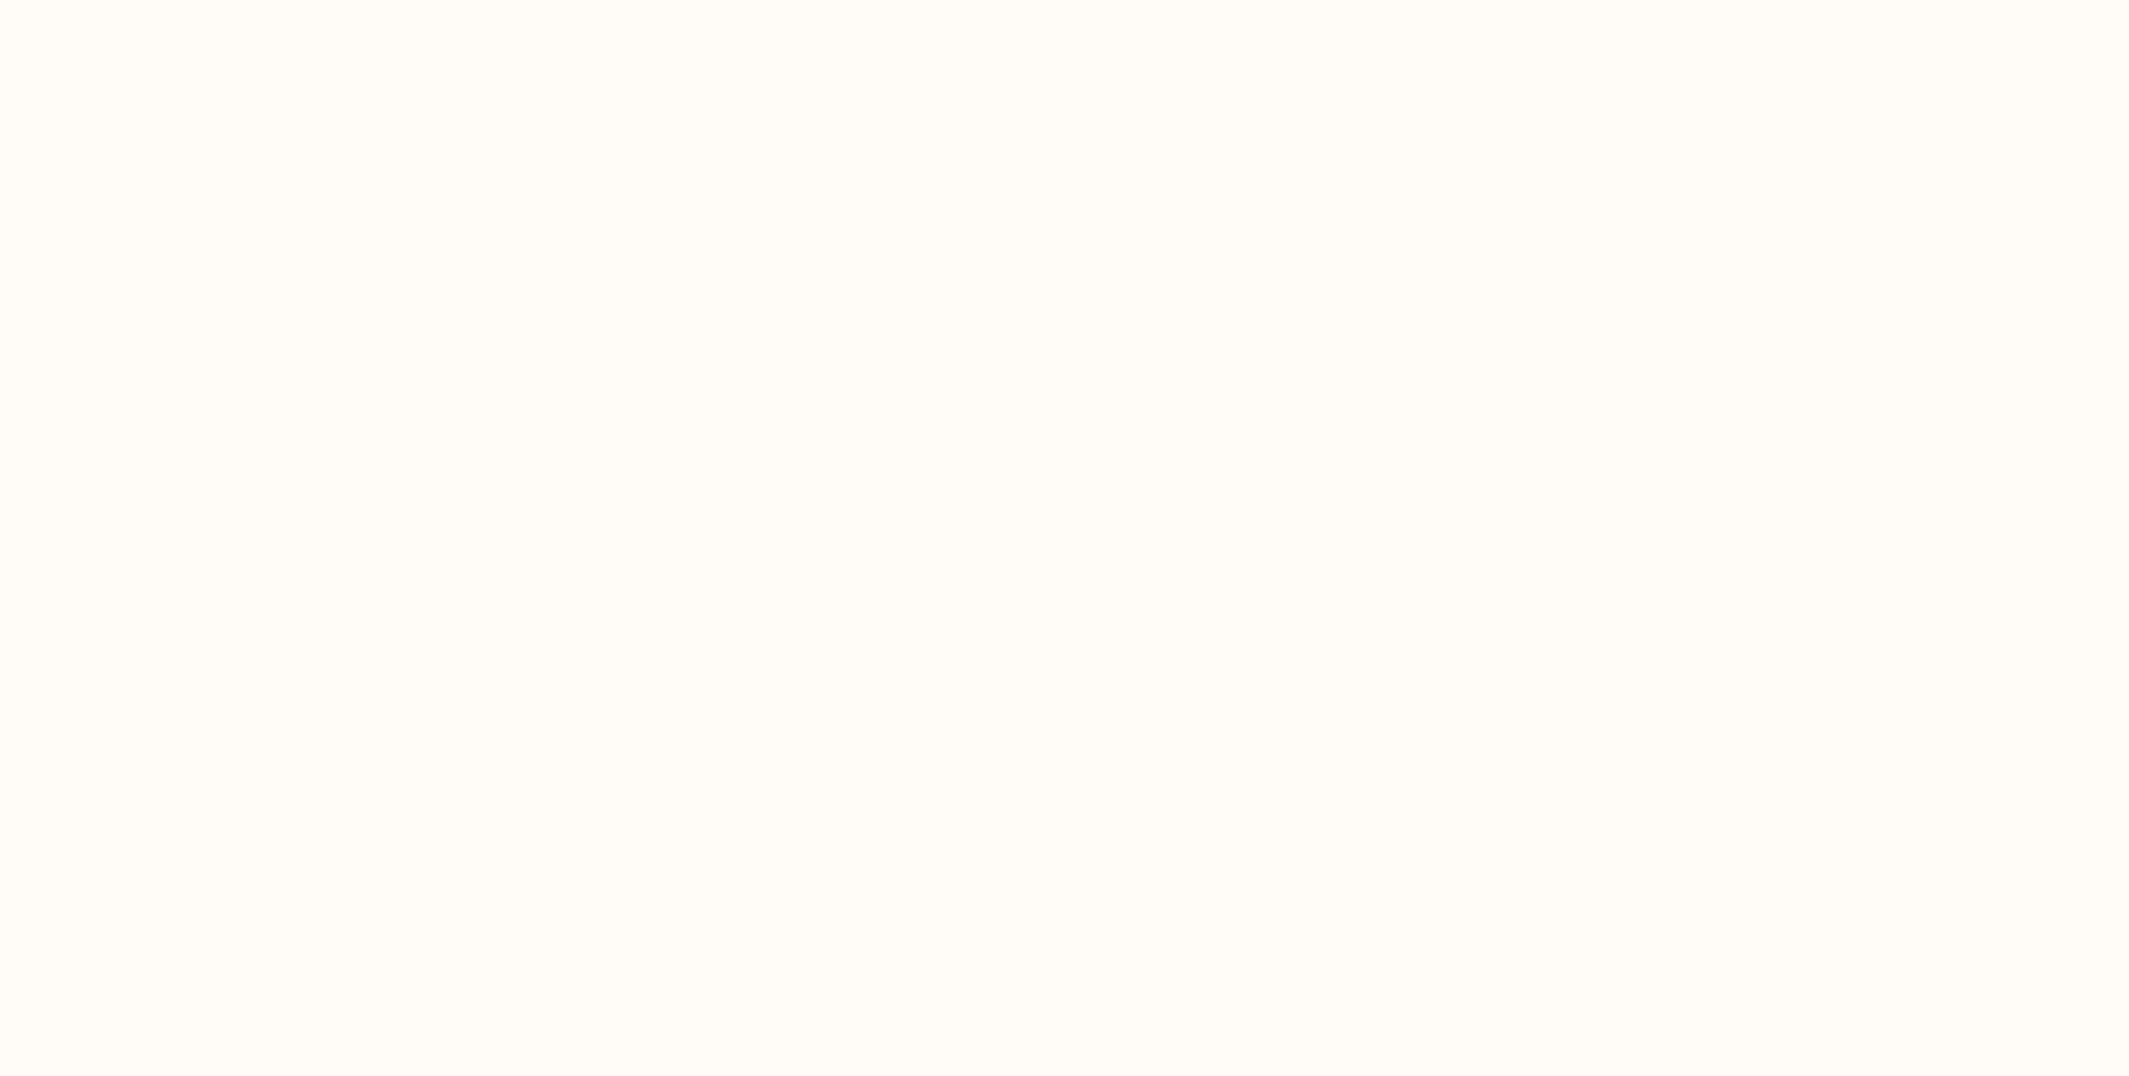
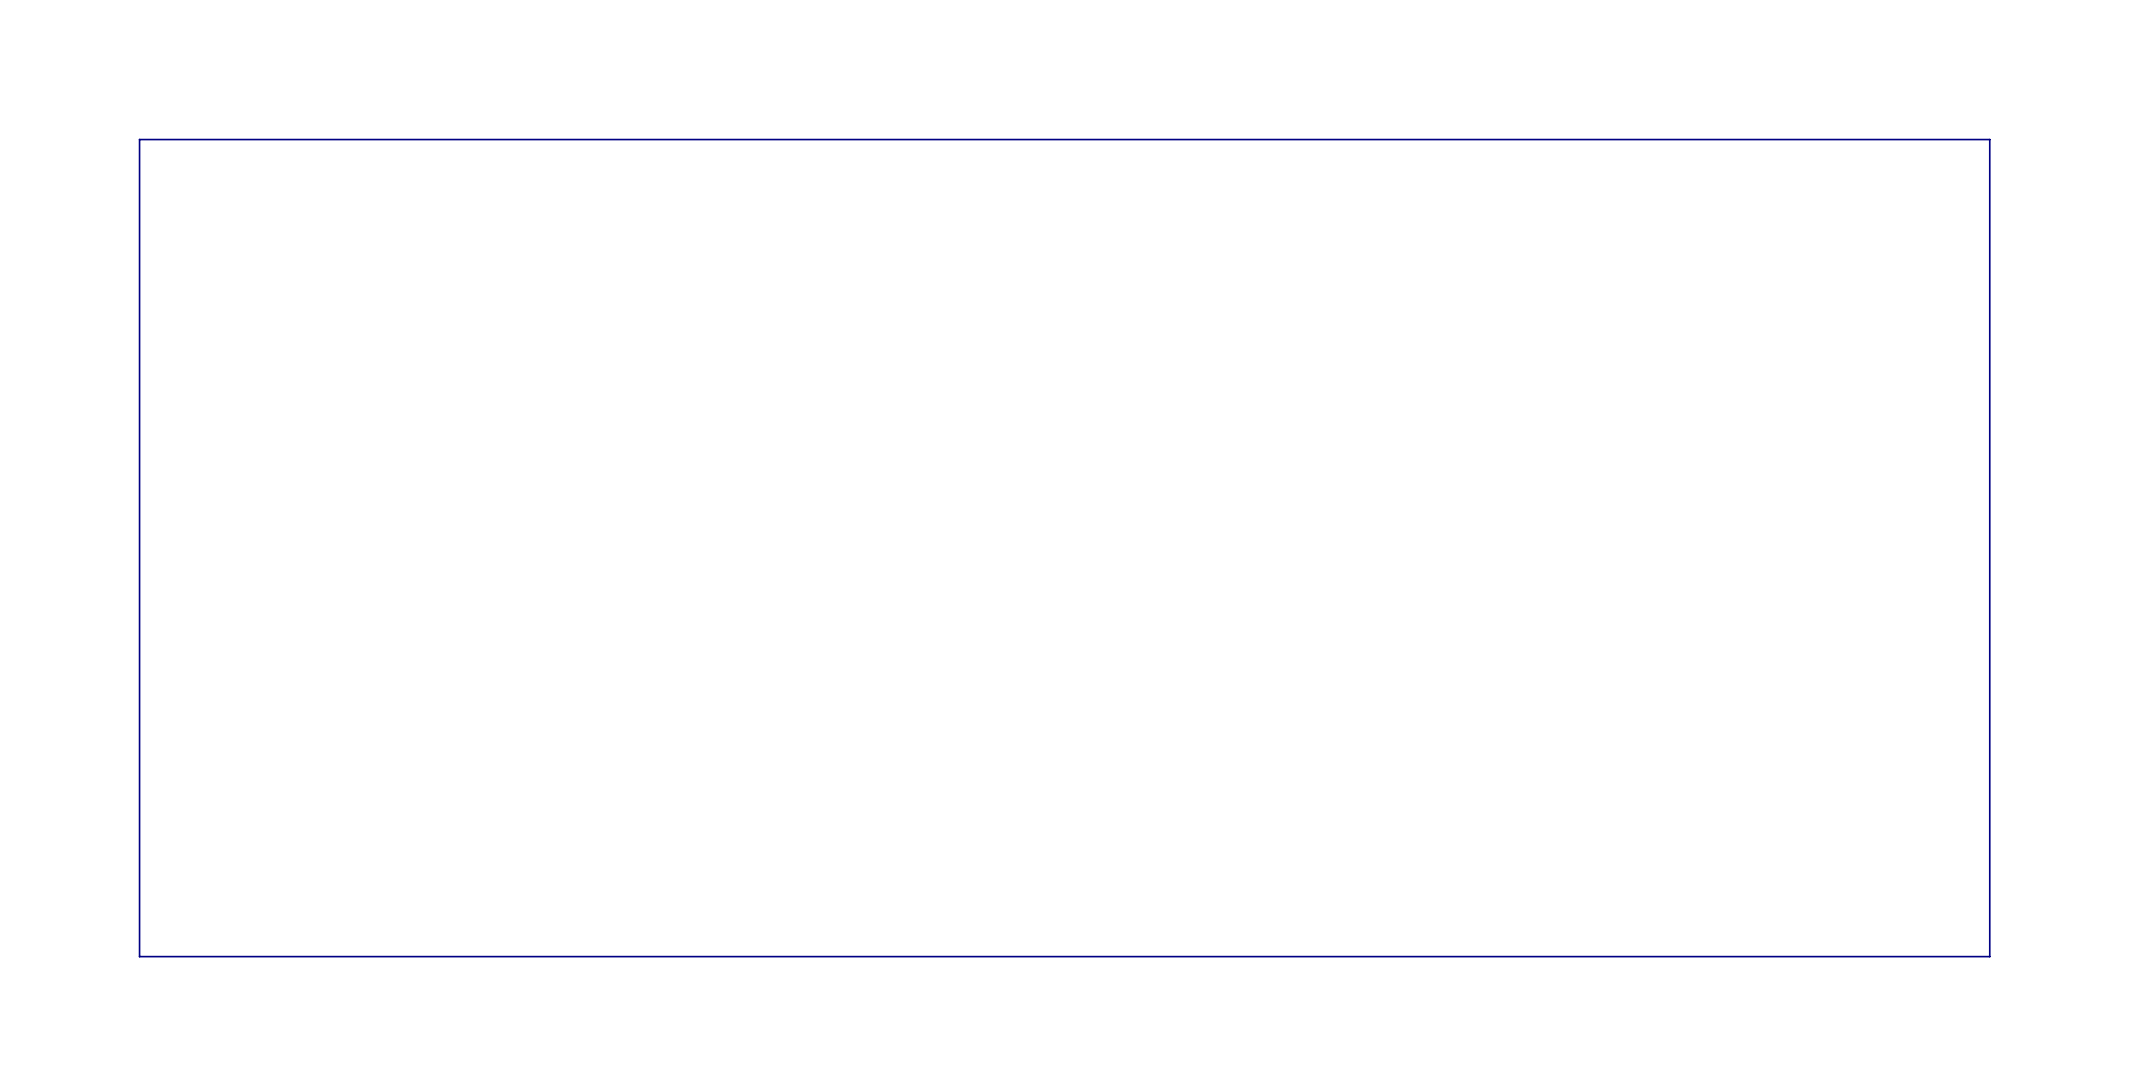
line: none -> (139, 139) (1989, 139) (1989, 956) (139, 956) (139, 139)

